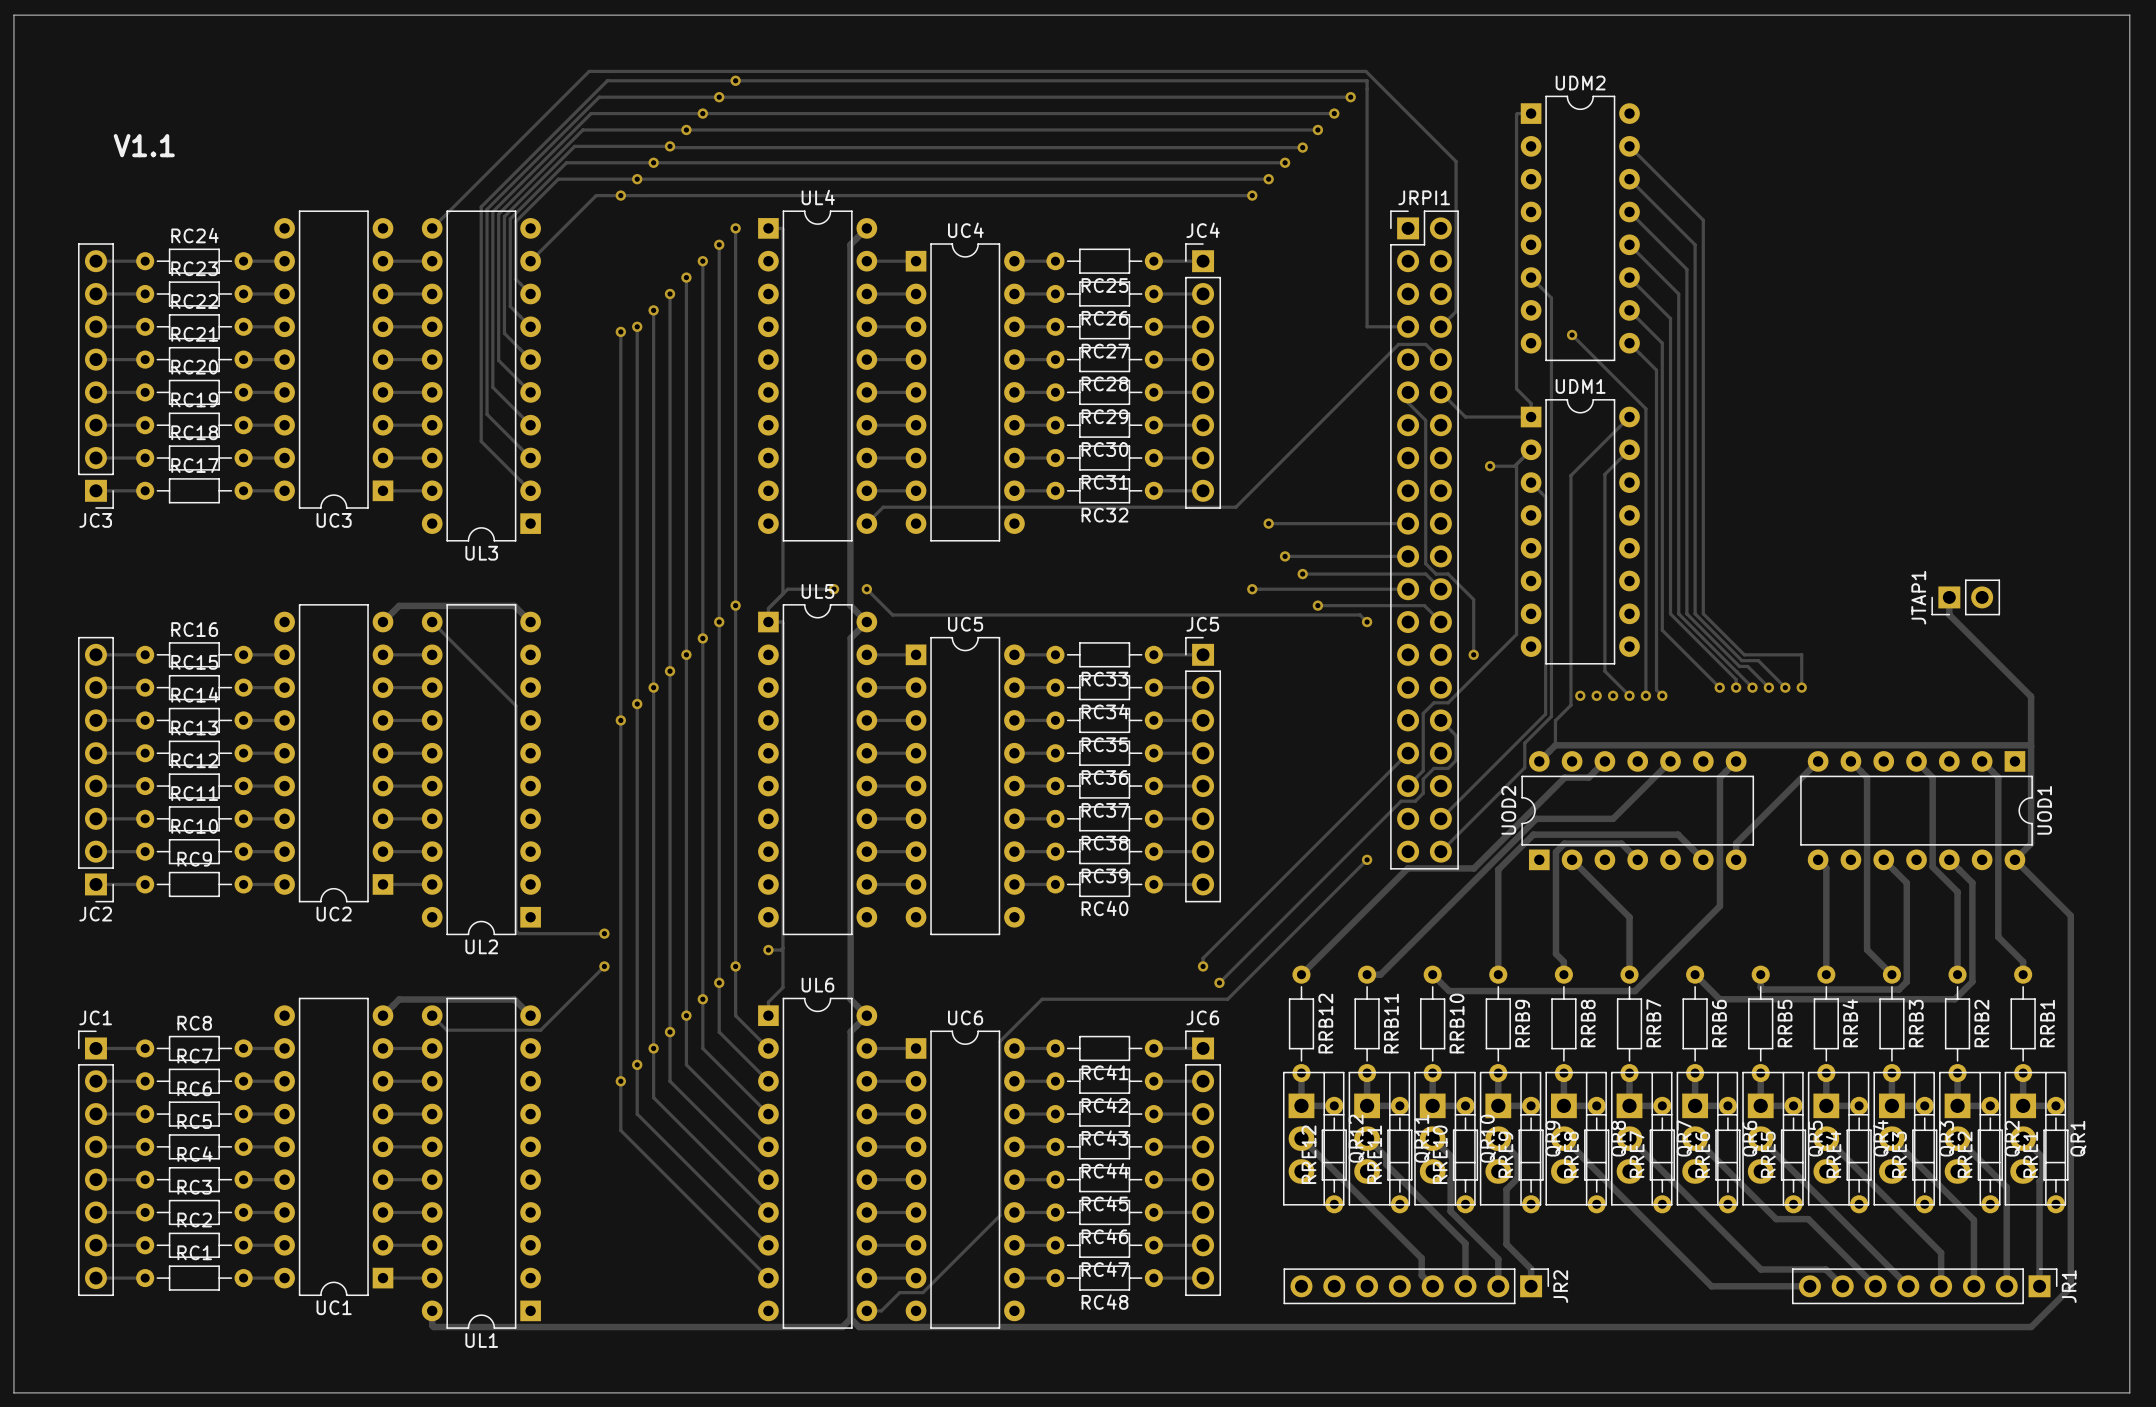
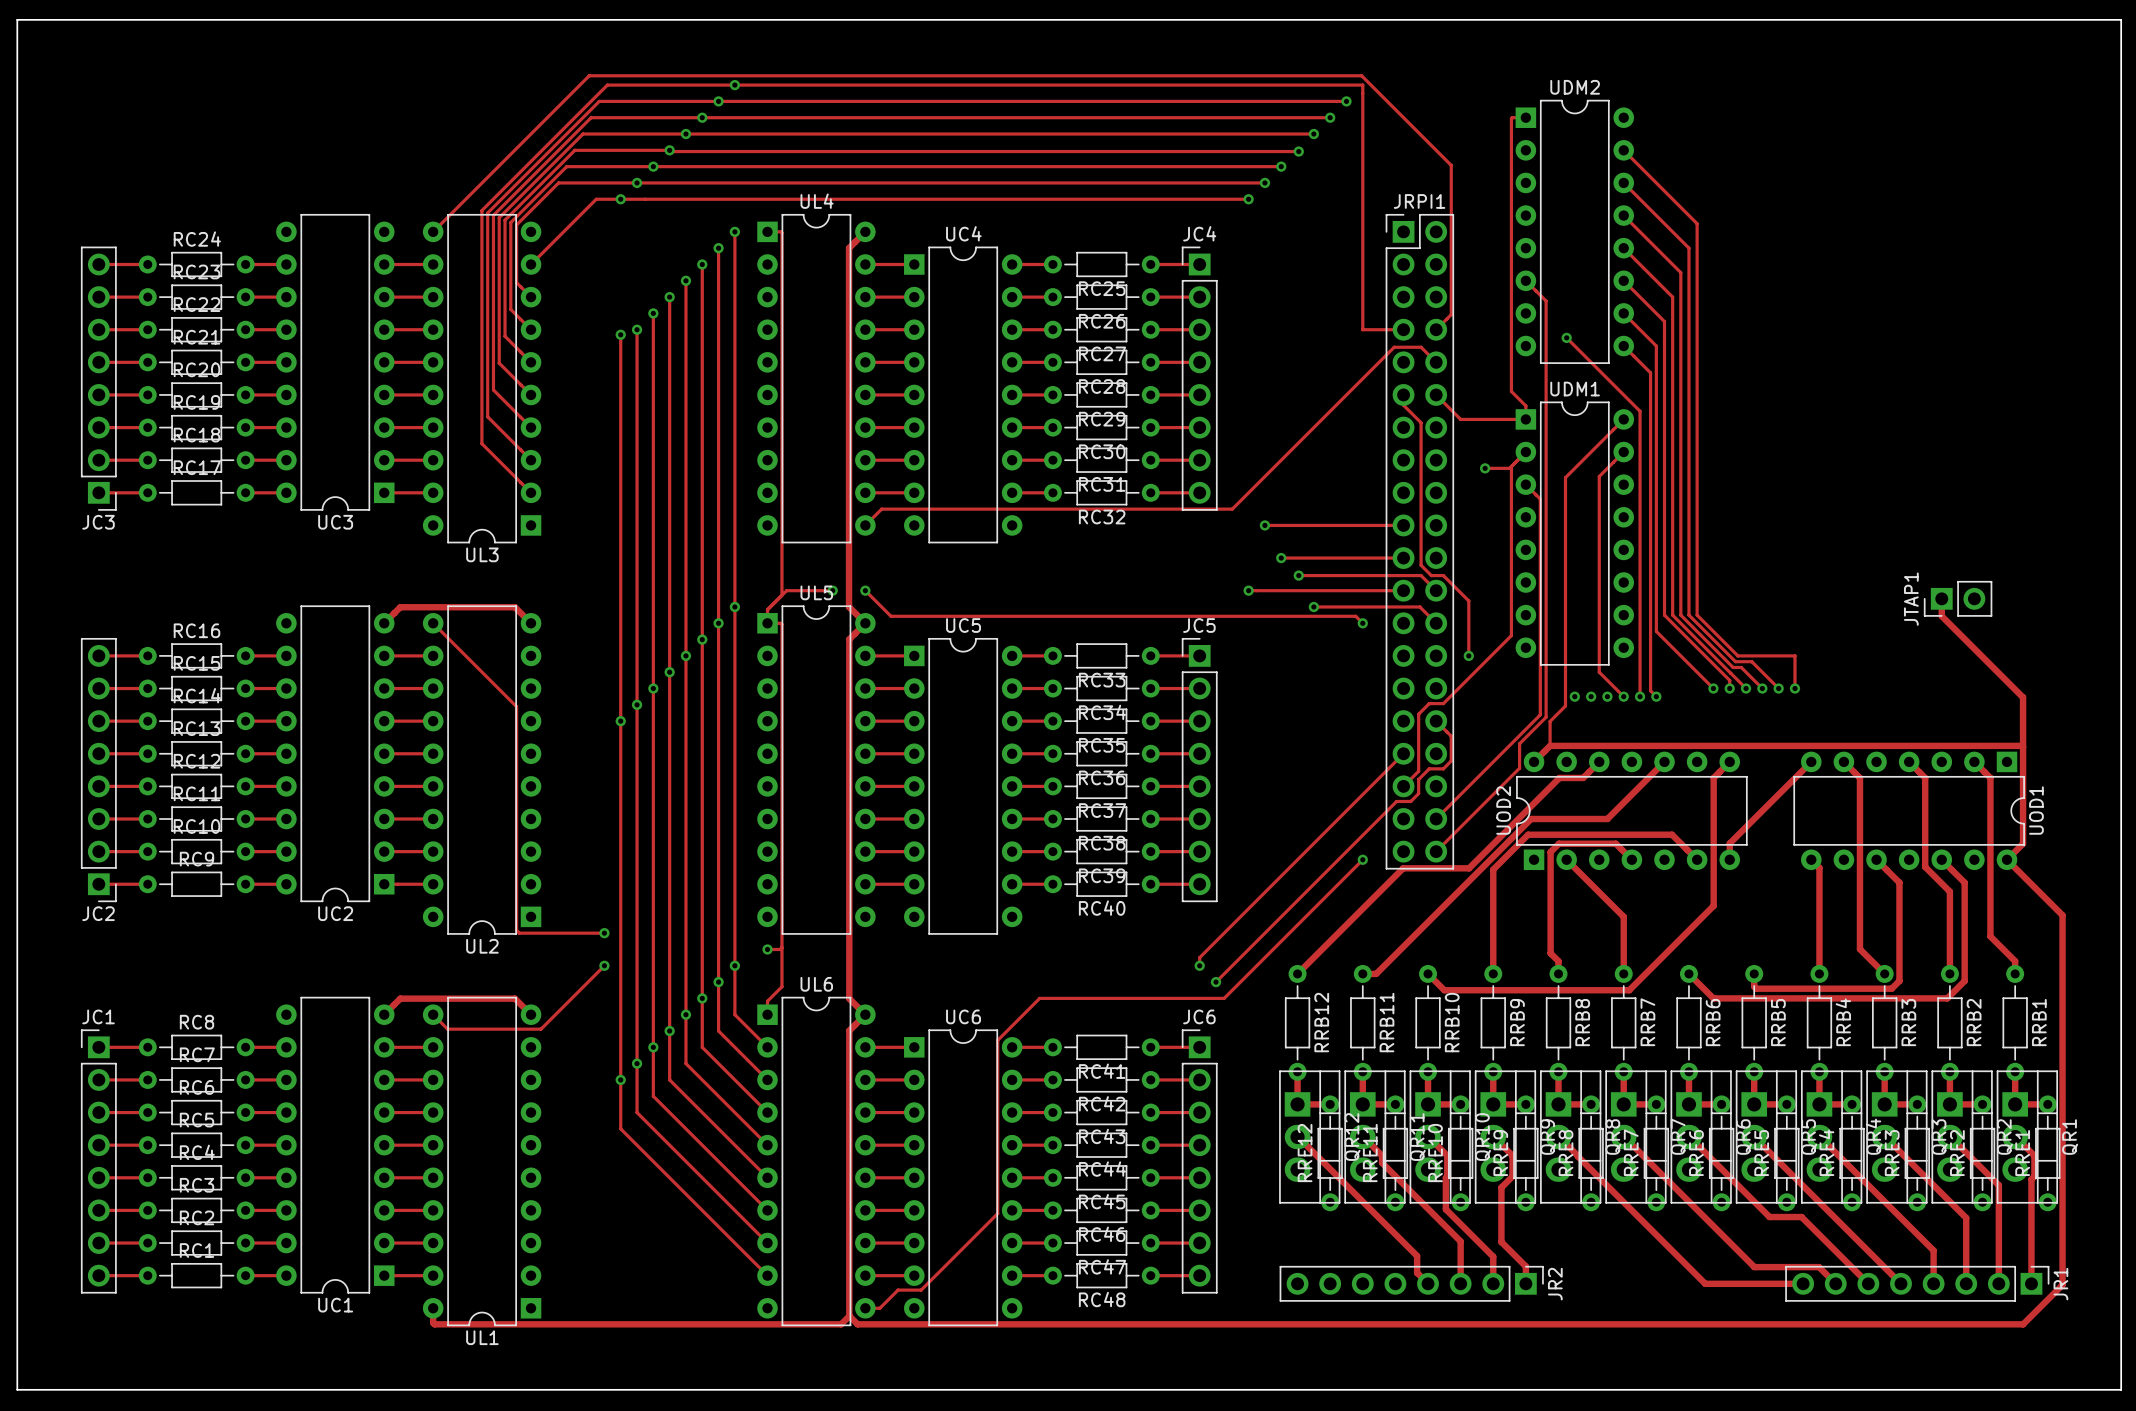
text: V1.1 (144, 145) -> none

